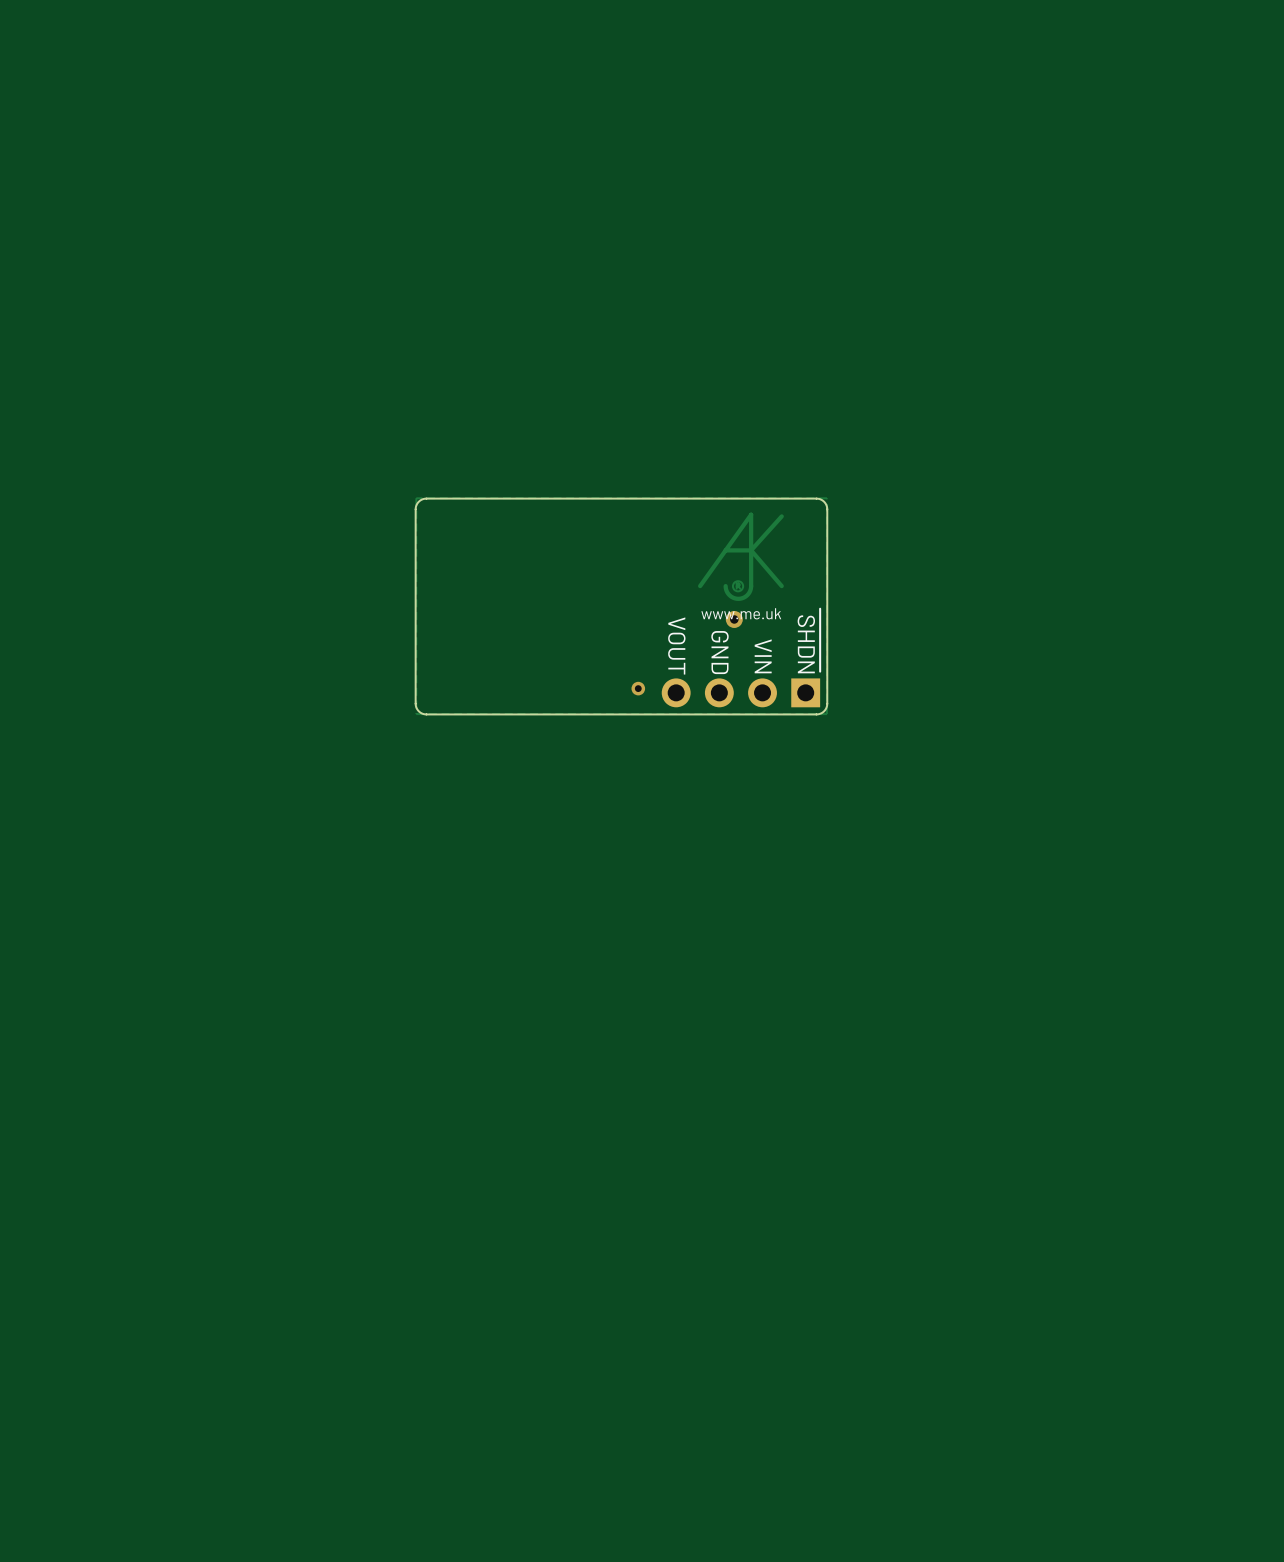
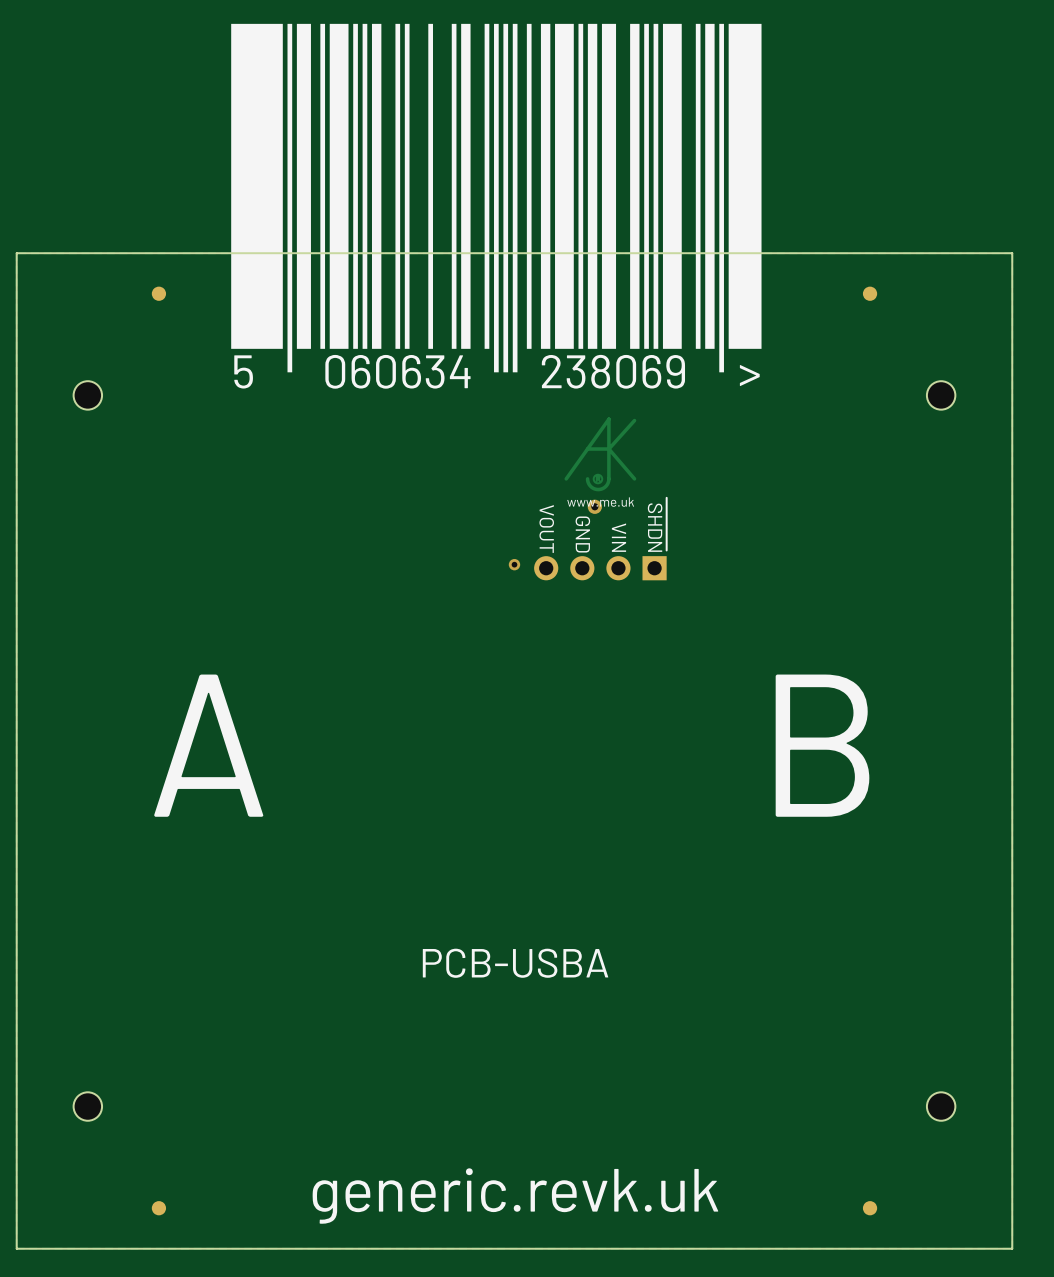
drawing: none -> [231, 23, 762, 373]
board edge: none -> (1012, 253) (16, 253) (16, 1248) (1012, 1248) (1012, 253)
part: none -> (158, 293)
part: none -> (870, 293)
part: none -> (87, 395)
part: none -> (941, 395)
board edge: (816, 498) (421, 499) (417, 503) (415, 509) (416, 708) (420, 712) (426, 714) (821, 713) (825, 709) (827, 703) (827, 509) (824, 501) (816, 498) -> none
text: none -> A (208, 745)
text: none -> B (822, 745)
text: none -> PCB-USBA (515, 963)
part: none -> (87, 1106)
part: none -> (941, 1106)
text: none -> generic.revk.uk (515, 1196)
part: none -> (158, 1208)
part: none -> (870, 1208)

